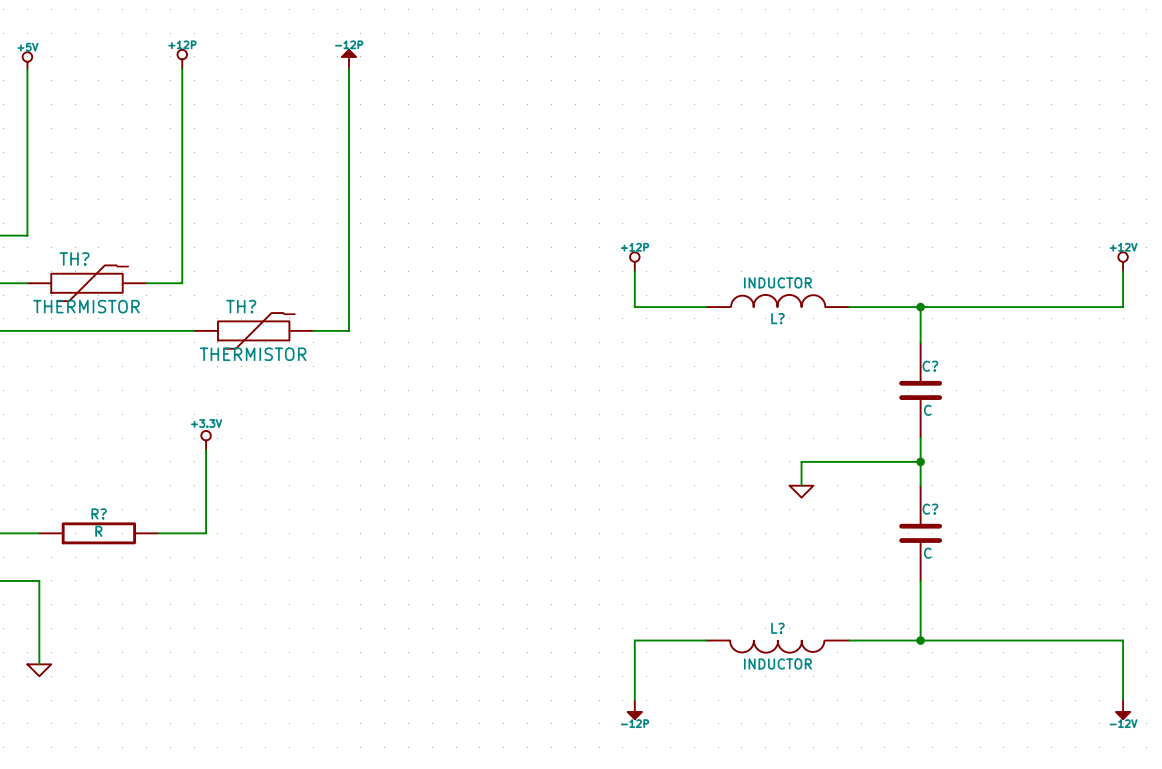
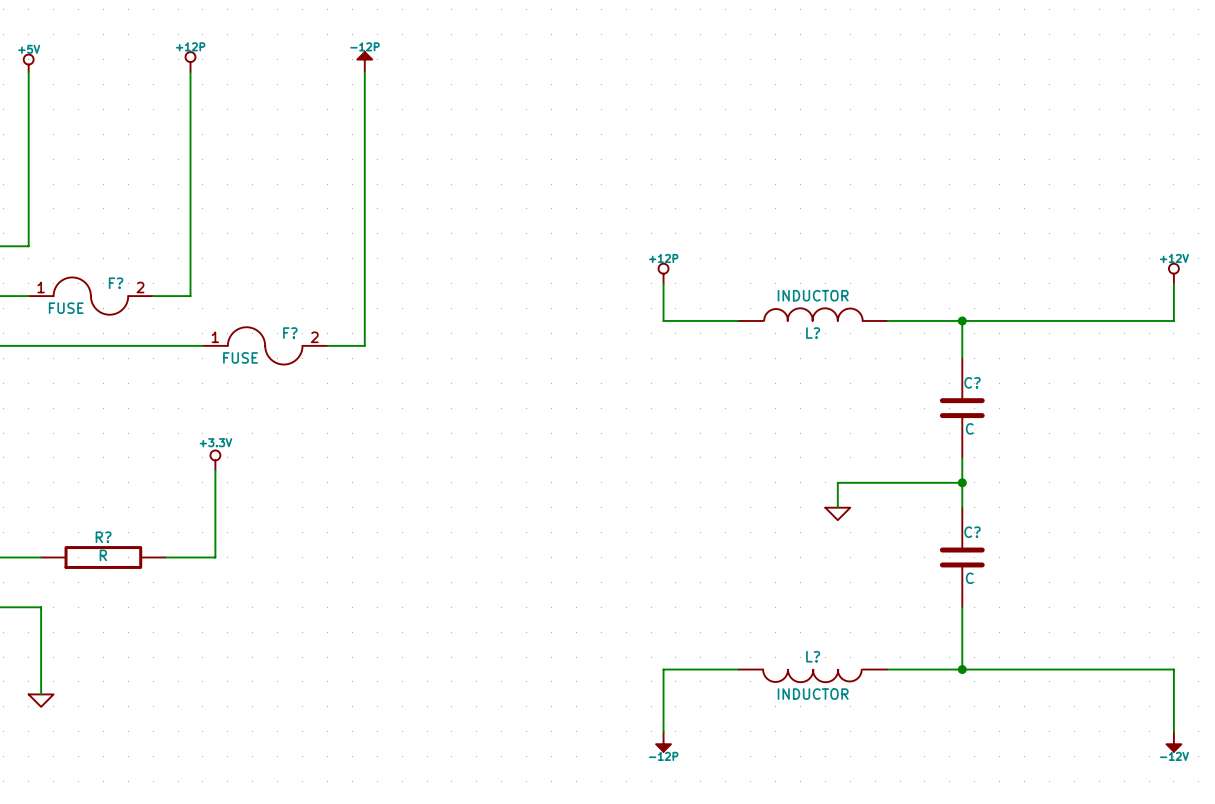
TH?: THERMISTOR (86, 283) -> none
F?: none -> FUSE (90, 296)
TH?: THERMISTOR (253, 330) -> none
F?: none -> FUSE (265, 345)

